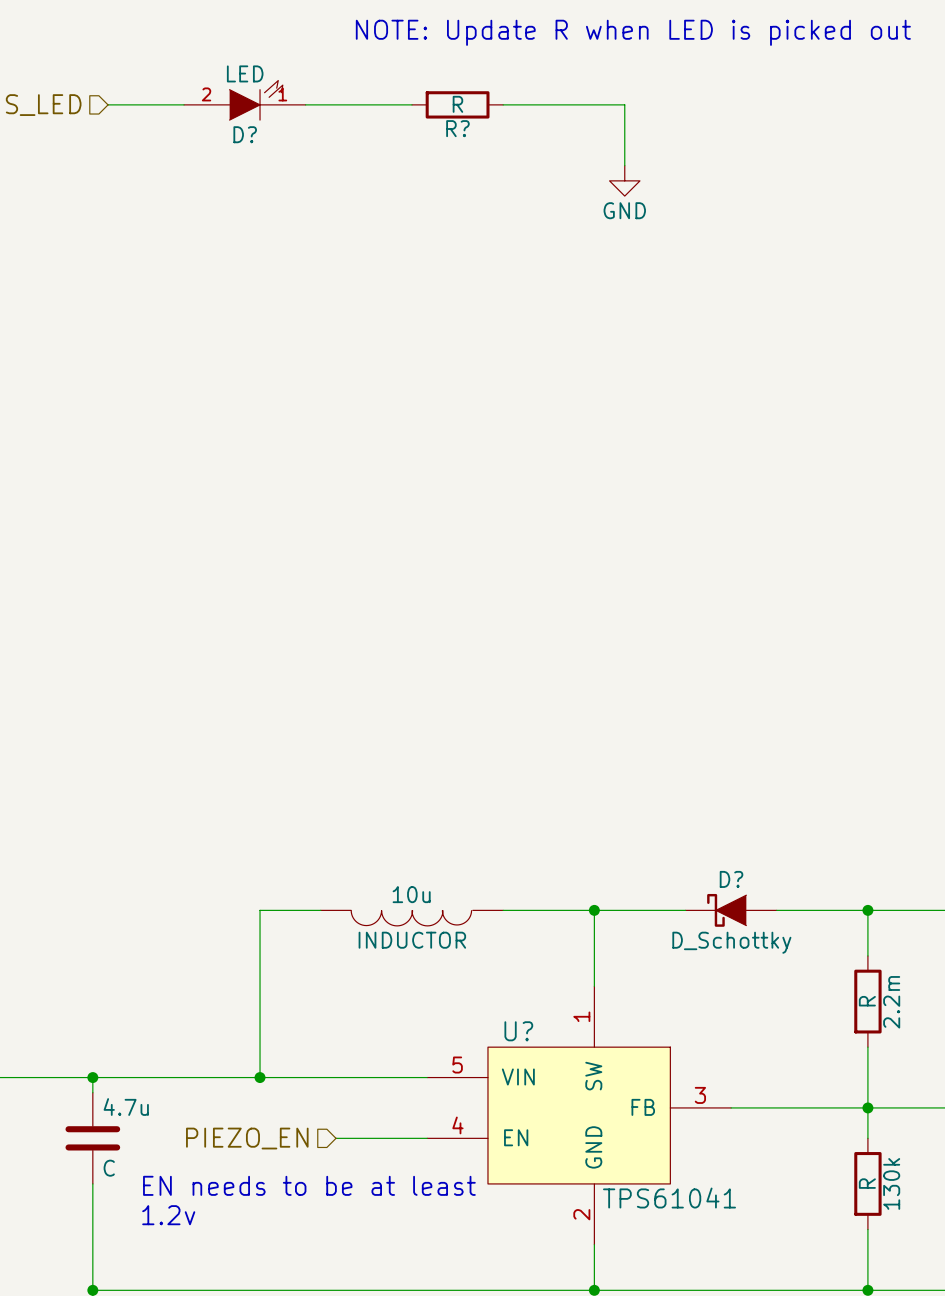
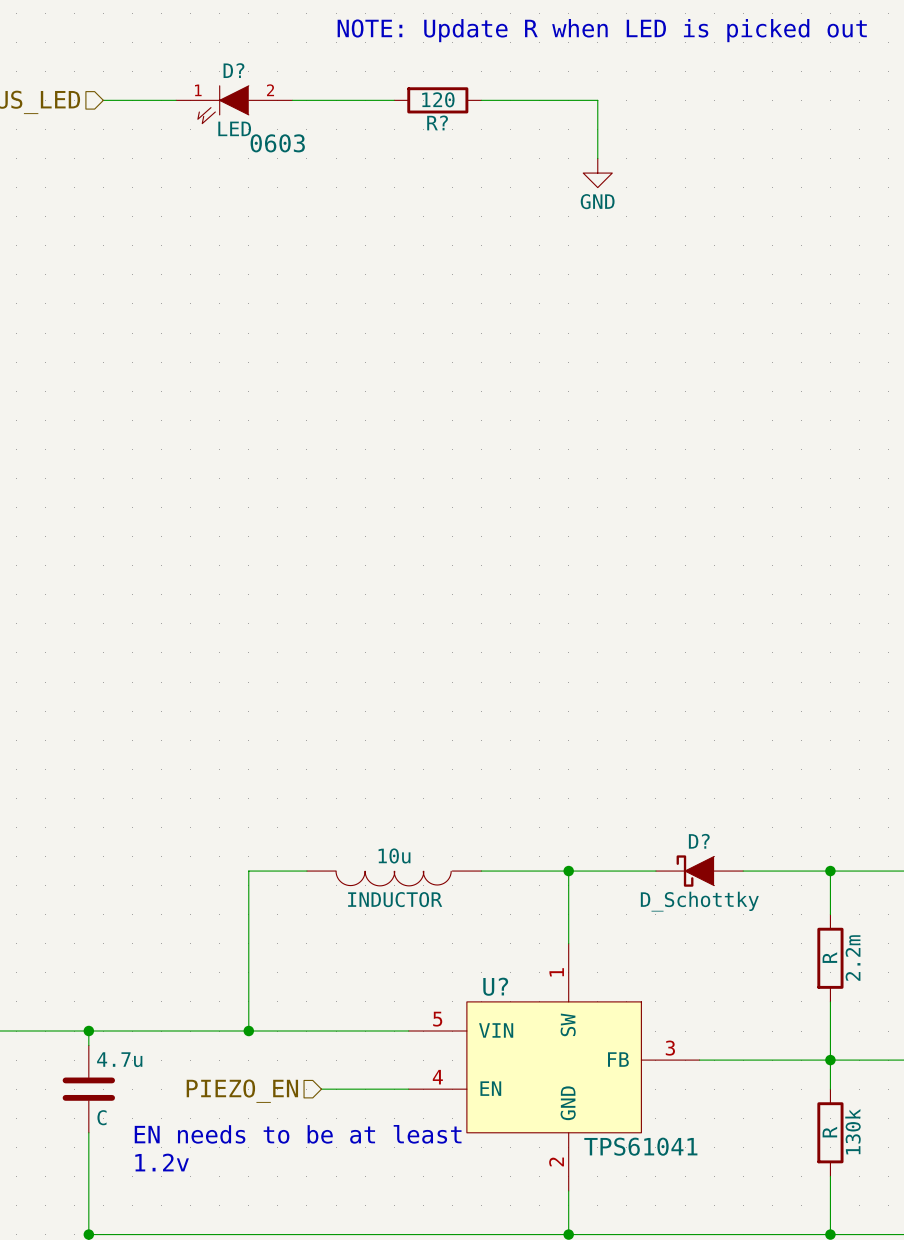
D? rotation: 0° (256, 100) -> 180° (223, 104)
R? value: R (457, 104) -> 120 (438, 99)
D? text: none -> 0603 (277, 143)

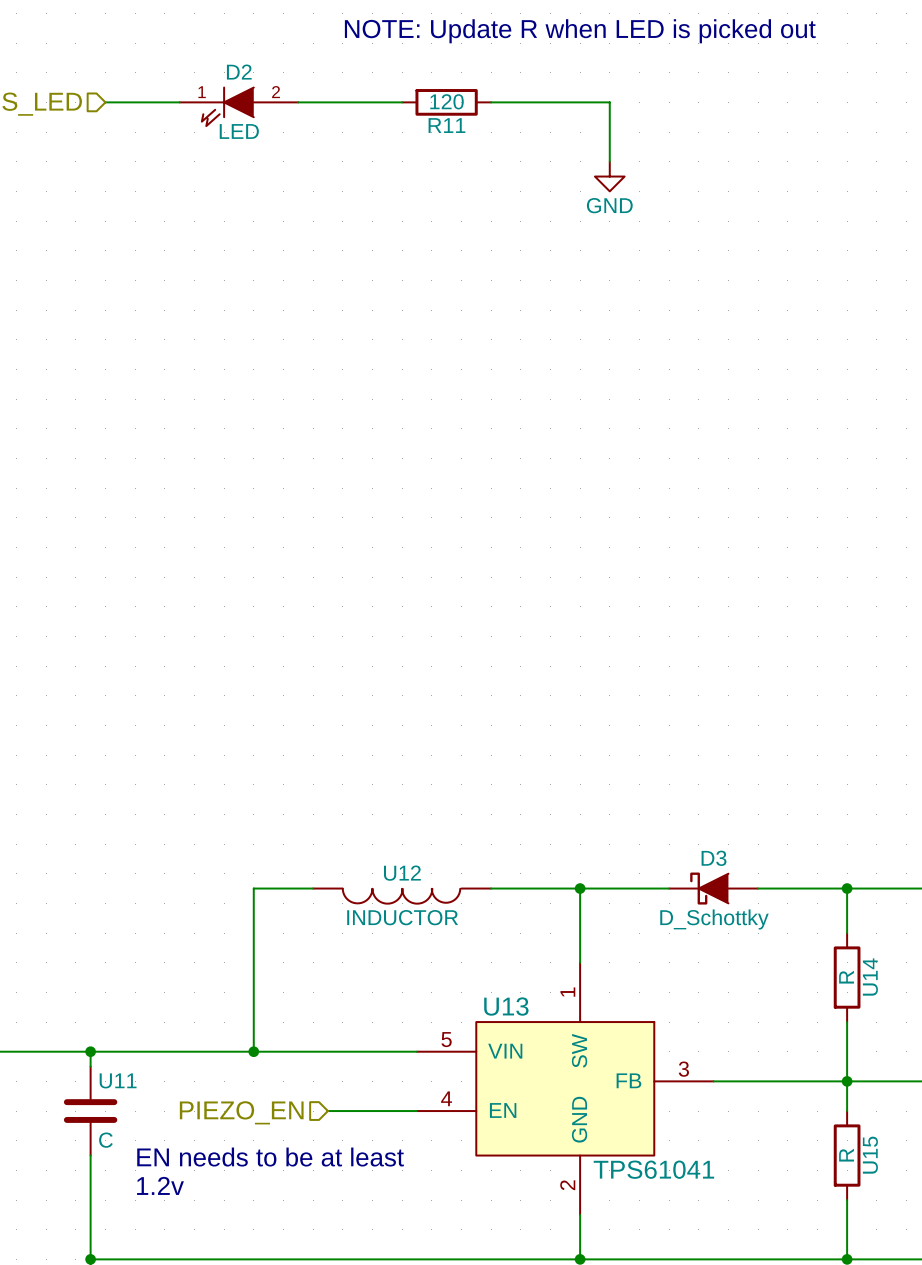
D? name: D? (233, 70) -> D2 (239, 72)
R? name: R? (437, 122) -> R11 (446, 125)
D? text: 0603 (277, 143) -> none
D? name: D? (699, 841) -> D3 (714, 858)
10u name: 10u (394, 855) -> U12 (402, 873)
2.2m name: 2.2m (853, 958) -> U14 (870, 977)
U? name: U? (495, 986) -> U13 (506, 1006)
4.7u name: 4.7u (119, 1059) -> U11 (118, 1080)
130k name: 130k (852, 1131) -> U15 (870, 1155)

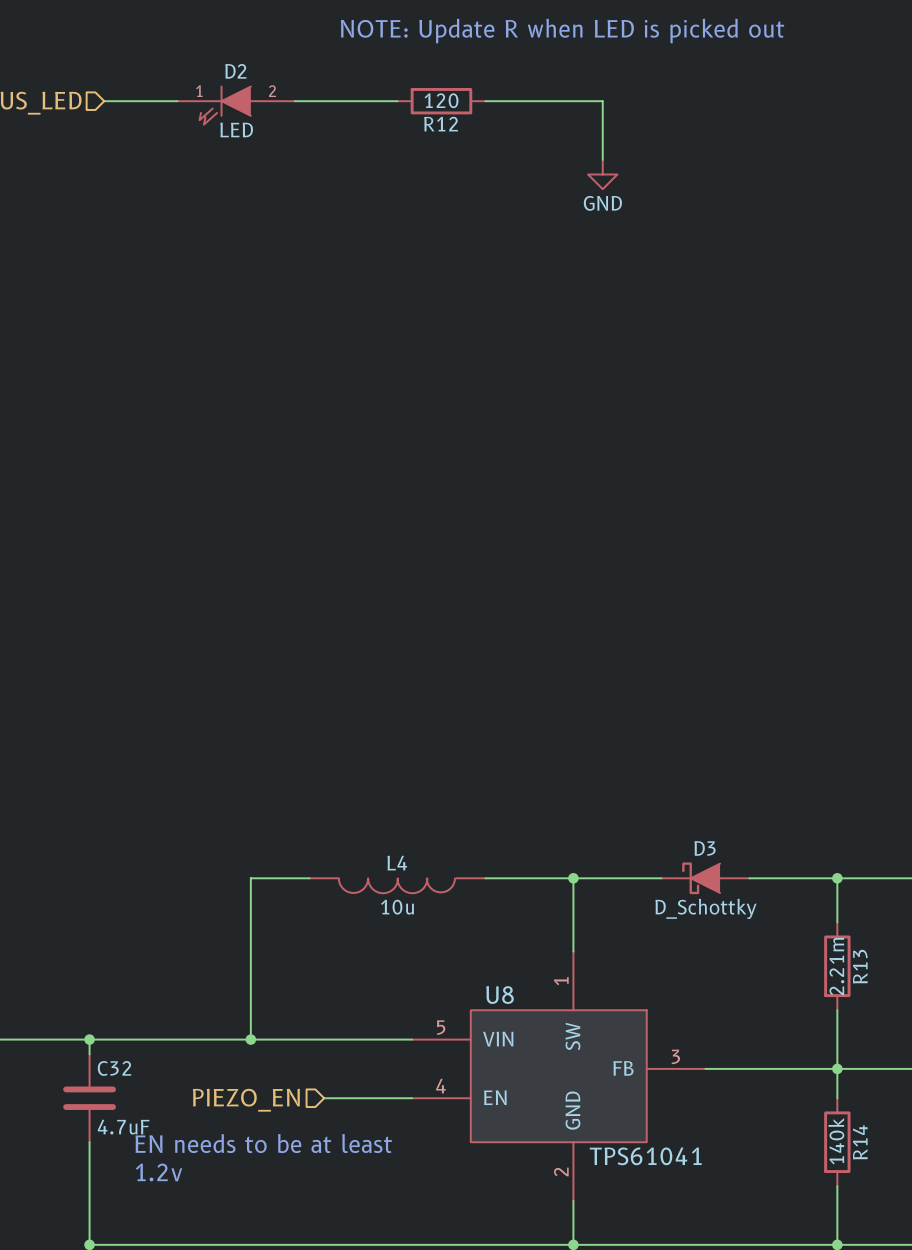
R11 name: R11 (446, 125) -> R12 (441, 124)
U12 name: U12 (402, 873) -> L4 (397, 863)
U12 value: INDUCTOR (402, 917) -> 10u (397, 907)
U14 value: R (846, 977) -> 2.21m (836, 966)
U14 name: U14 (870, 977) -> R13 (860, 966)
U13 name: U13 (506, 1006) -> U8 (500, 995)
U11 name: U11 (118, 1080) -> C32 (114, 1068)
U11 value: C (105, 1140) -> 4.7uF (123, 1127)
U15 value: R (846, 1155) -> 140k (836, 1141)
U15 name: U15 (870, 1155) -> R14 (860, 1142)

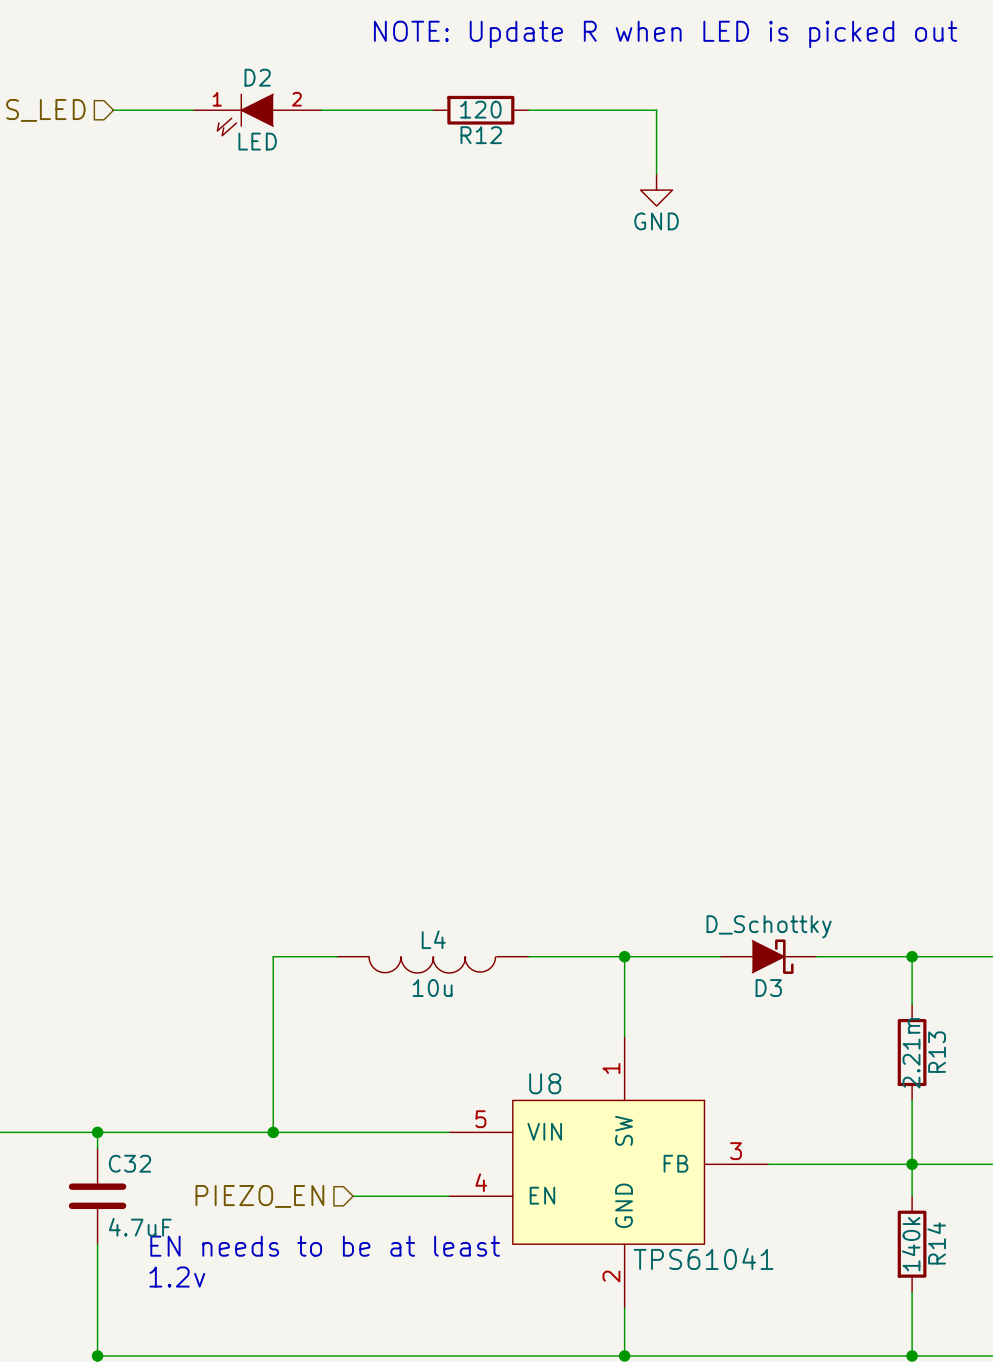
D3 rotation: 0° (701, 878) -> 180° (772, 956)

